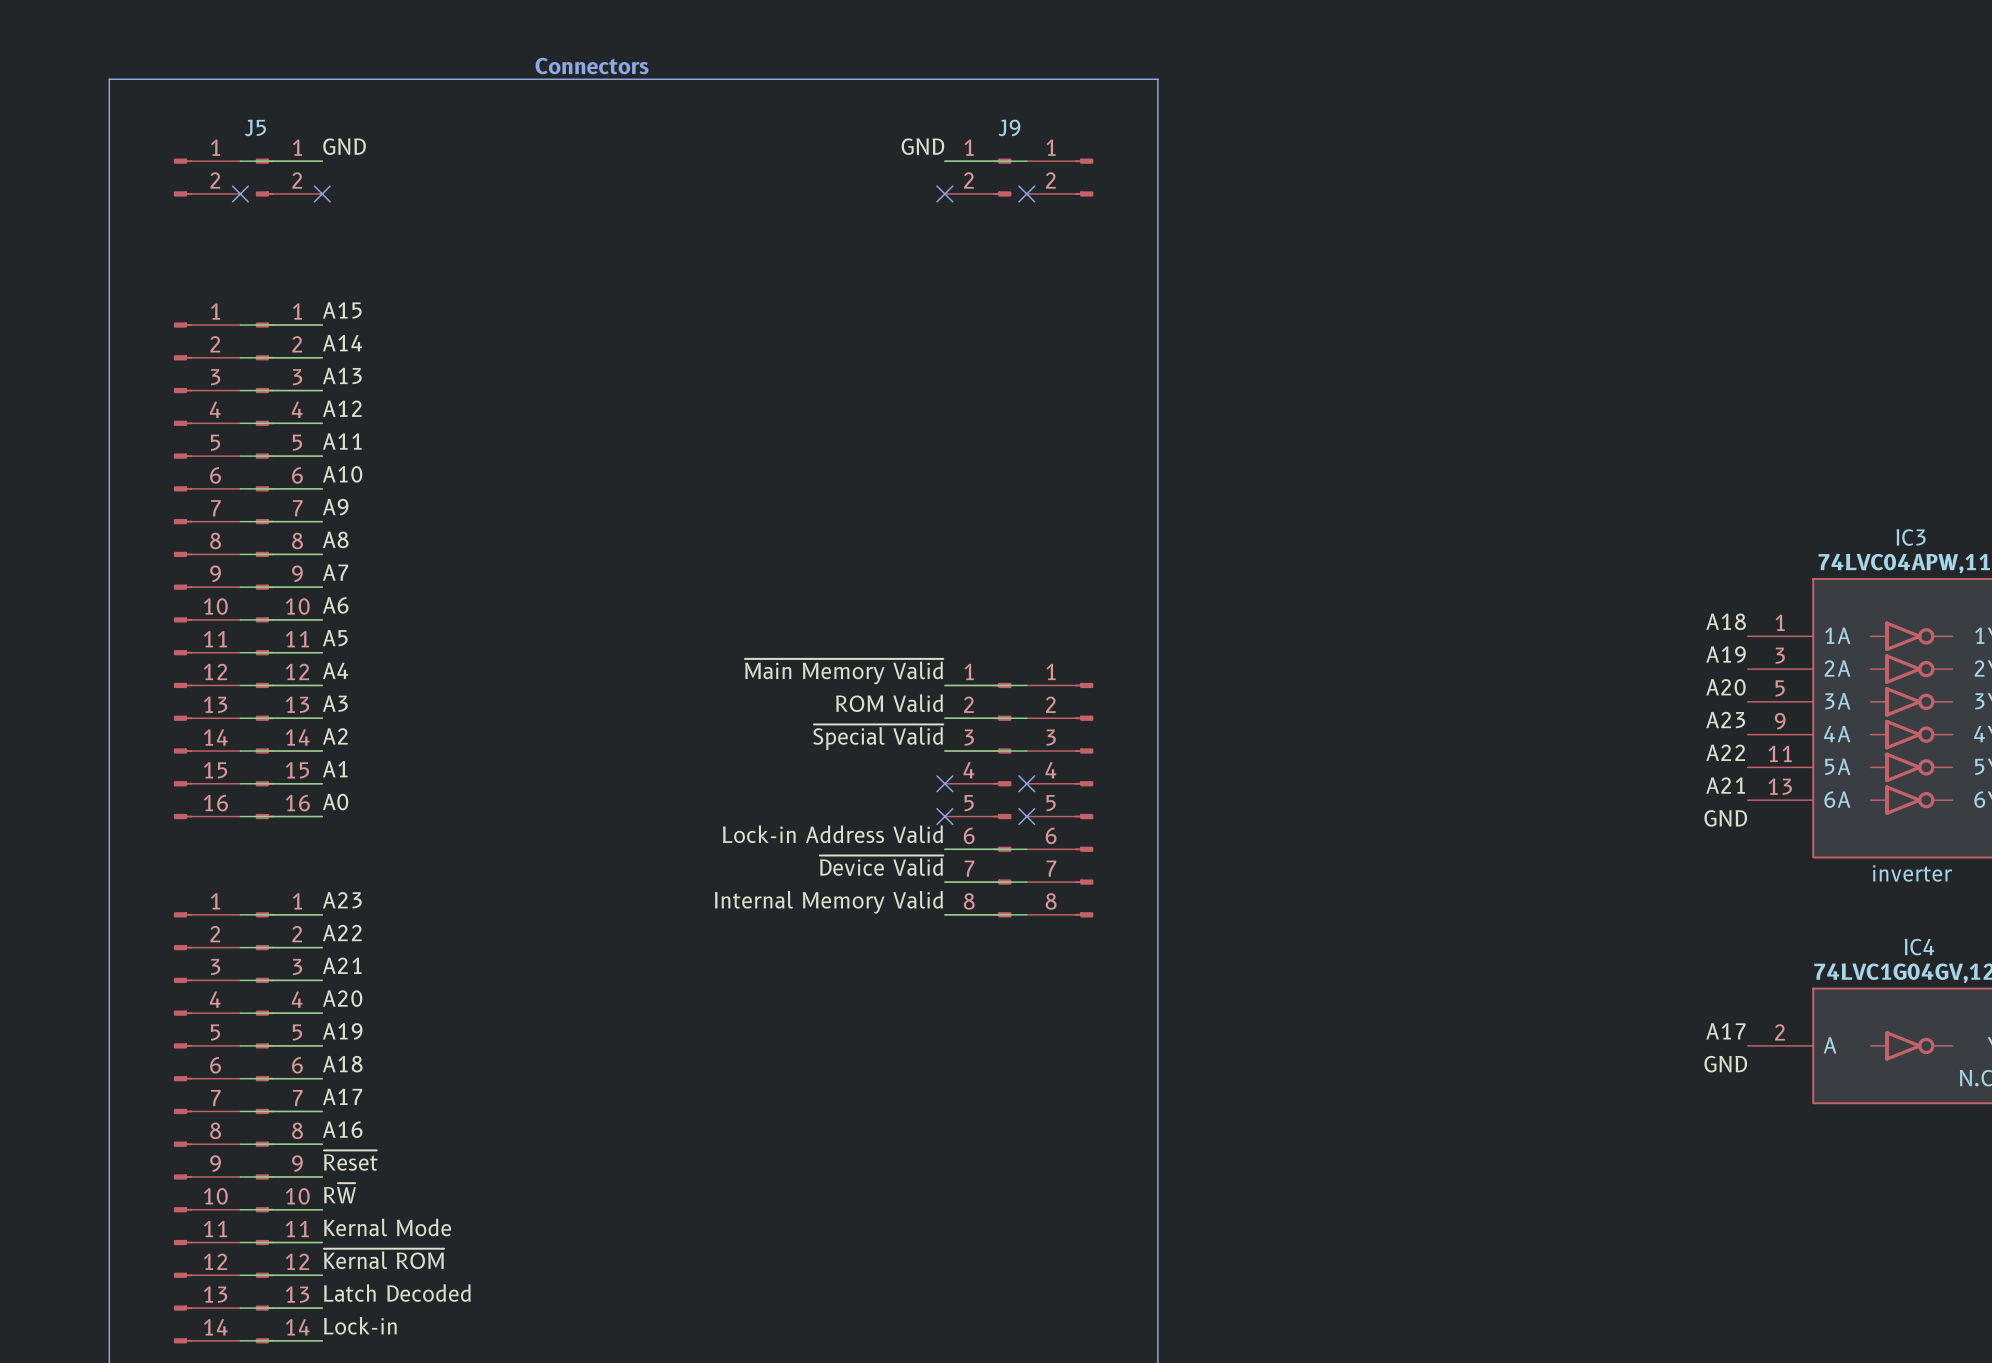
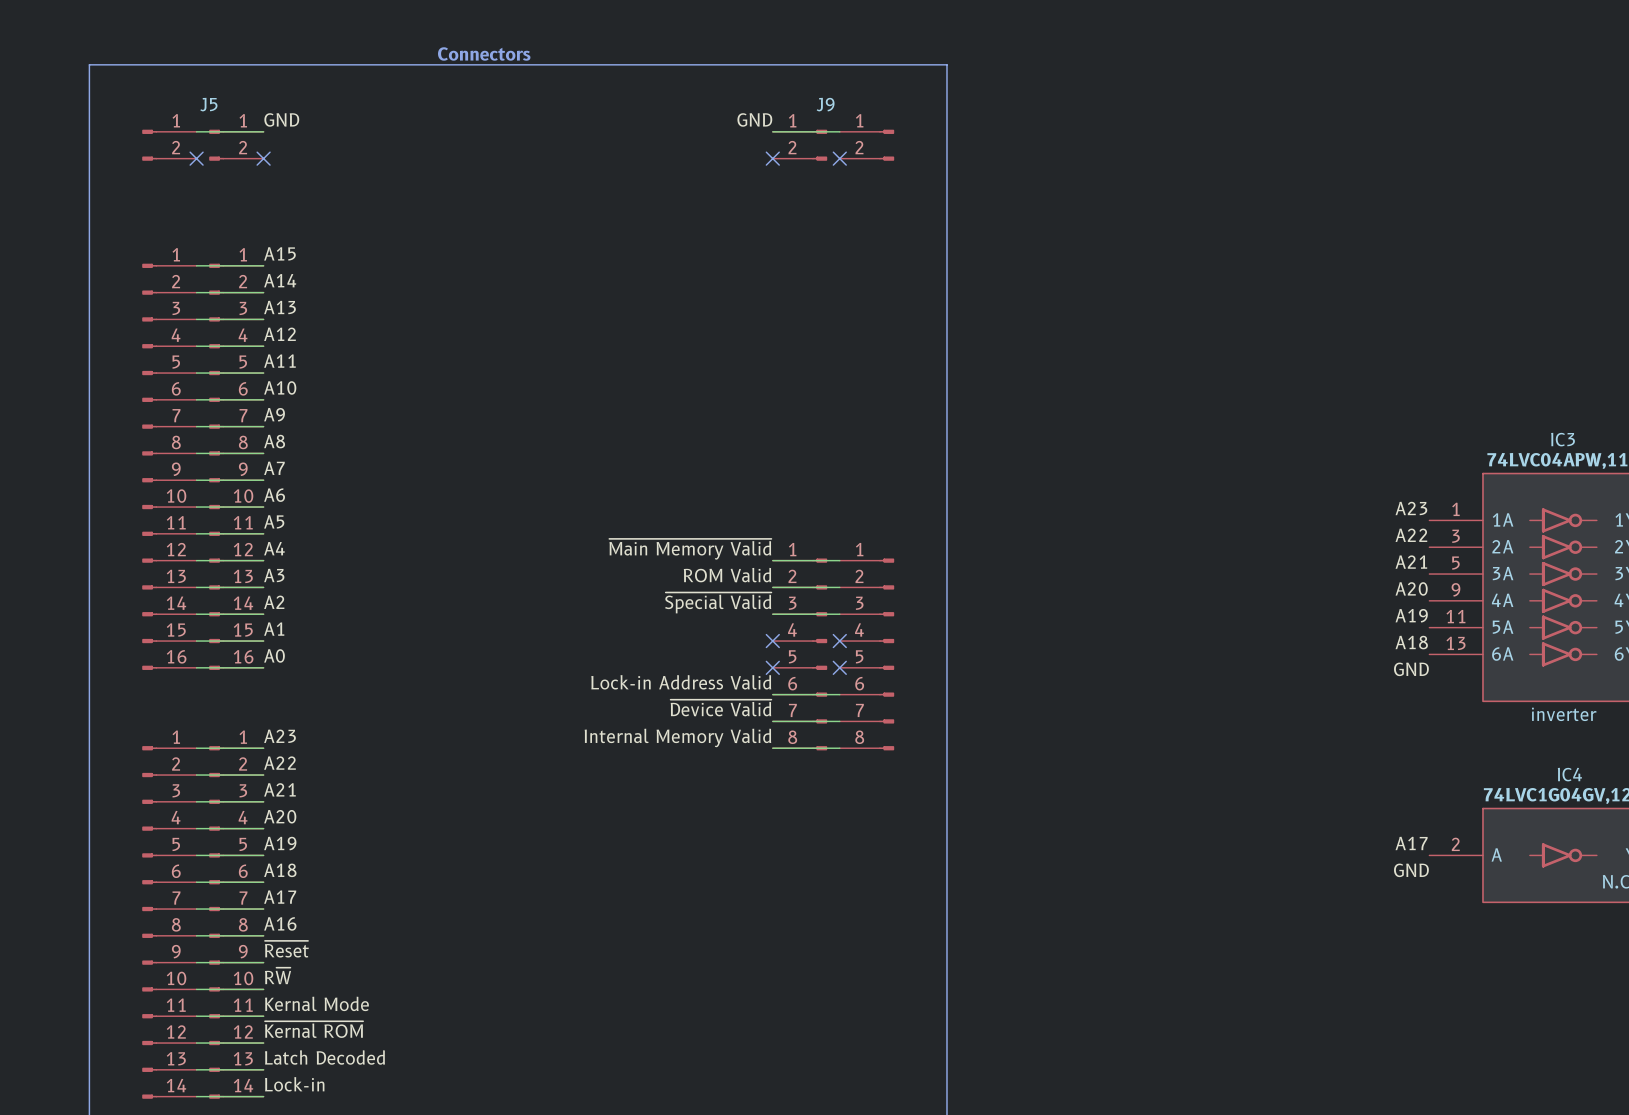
label: A18 (1726, 621) -> A23 (1411, 508)
label: A19 (1726, 654) -> A22 (1411, 535)
label: A20 (1725, 687) -> A21 (1411, 562)
label: A23 (1725, 720) -> A20 (1411, 588)
label: A22 (1725, 752) -> A19 (1411, 615)
label: A21 (1725, 785) -> A18 (1411, 642)

